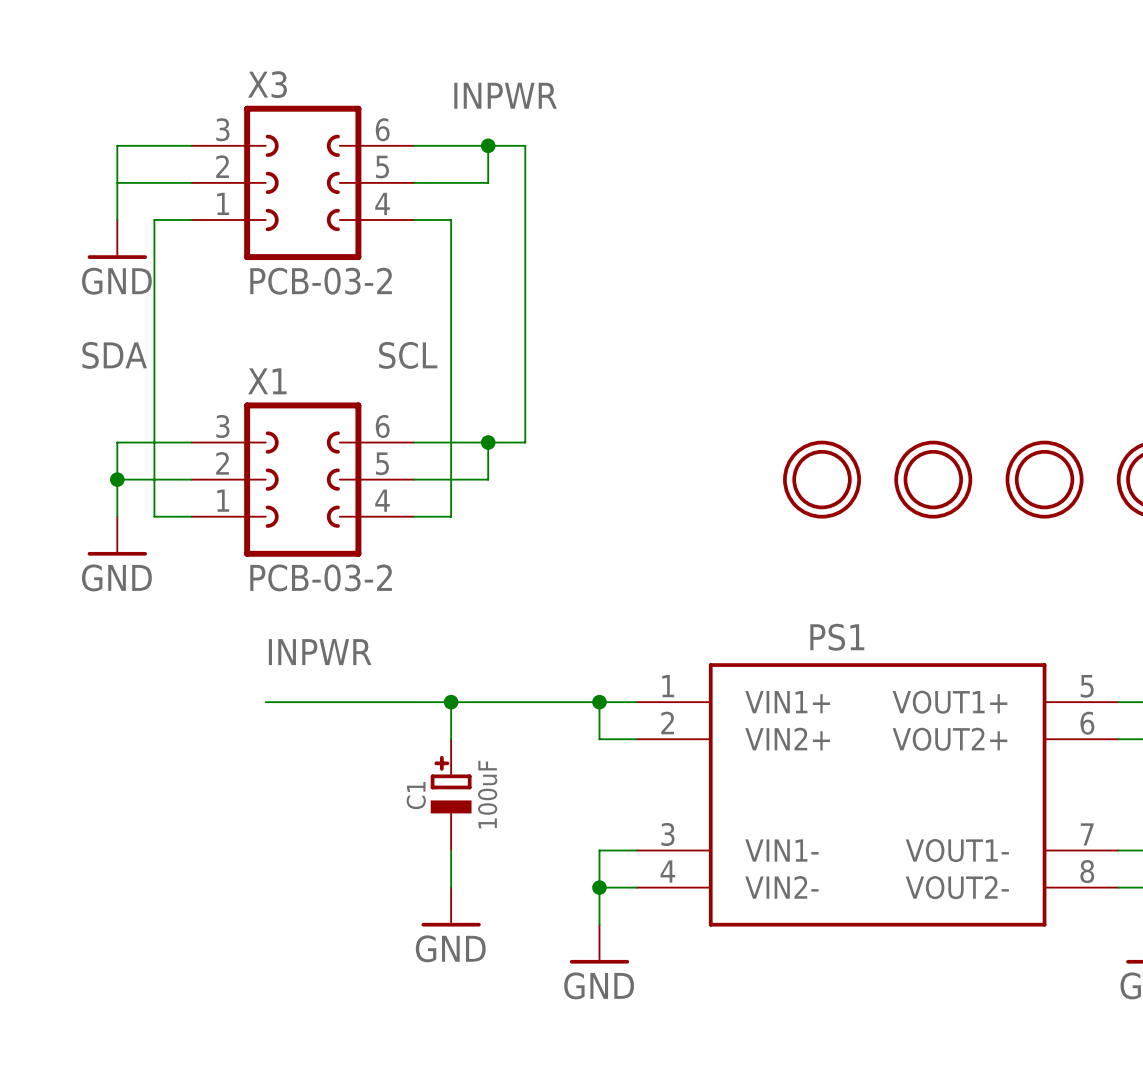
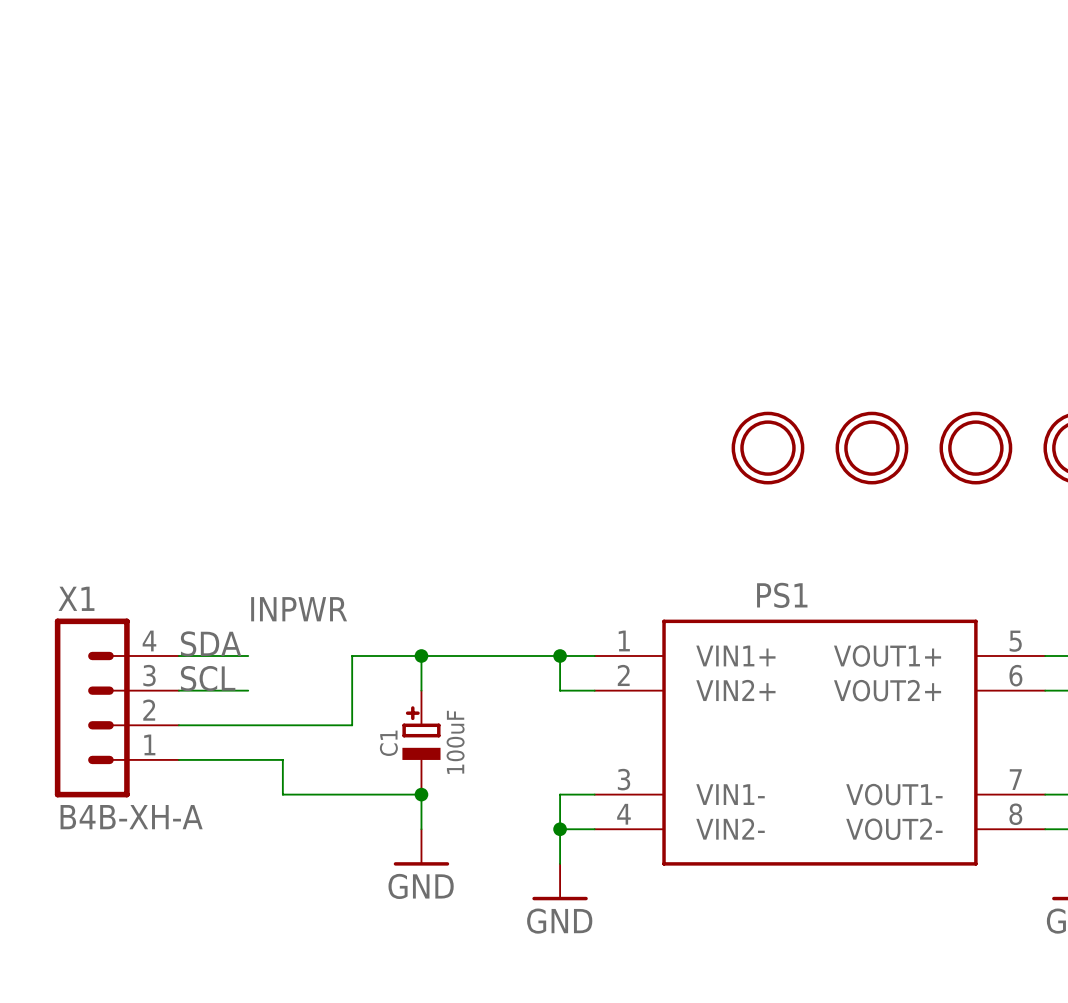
label: INPWR (505, 95) -> none
wire: (191, 145) (117, 145) (117, 219) -> none
wire: (414, 145) (525, 145) (525, 442) (414, 442) -> none
wire: (488, 145) (488, 182) (414, 182) -> none
junction: (488, 145) -> none
wire: (117, 182) (191, 182) -> none
X3: PCB-03-2 (302, 182) -> none
wire: (191, 219) (154, 219) (154, 516) (191, 516) -> none
wire: (414, 219) (451, 219) (451, 516) (414, 516) -> none
power symbol: GND (117, 239) -> none
label position: SDA (114, 355) -> SDA (211, 643)
label: SCL (408, 355) -> none
X1 symbol: [191, 402, 415, 557] -> [54, 618, 179, 798]
wire: (191, 442) (117, 442) (117, 516) -> none
wire: (488, 442) (488, 479) (414, 479) -> none
junction: (488, 442) -> none
wire: (117, 479) (191, 479) -> (178, 656) (248, 656)
junction: (117, 479) -> none
power symbol: GND (117, 536) -> none
X1 value: PCB-03-2 (321, 577) -> B4B-XH-A (131, 817)
wire: (265, 702) (376, 702) -> (178, 725) (352, 725) (352, 656)
label: none -> SCL (208, 678)
wire: none -> (178, 690) (248, 690)
wire: none -> (178, 759) (282, 759) (282, 794) (421, 794)
junction: none -> (421, 794)

